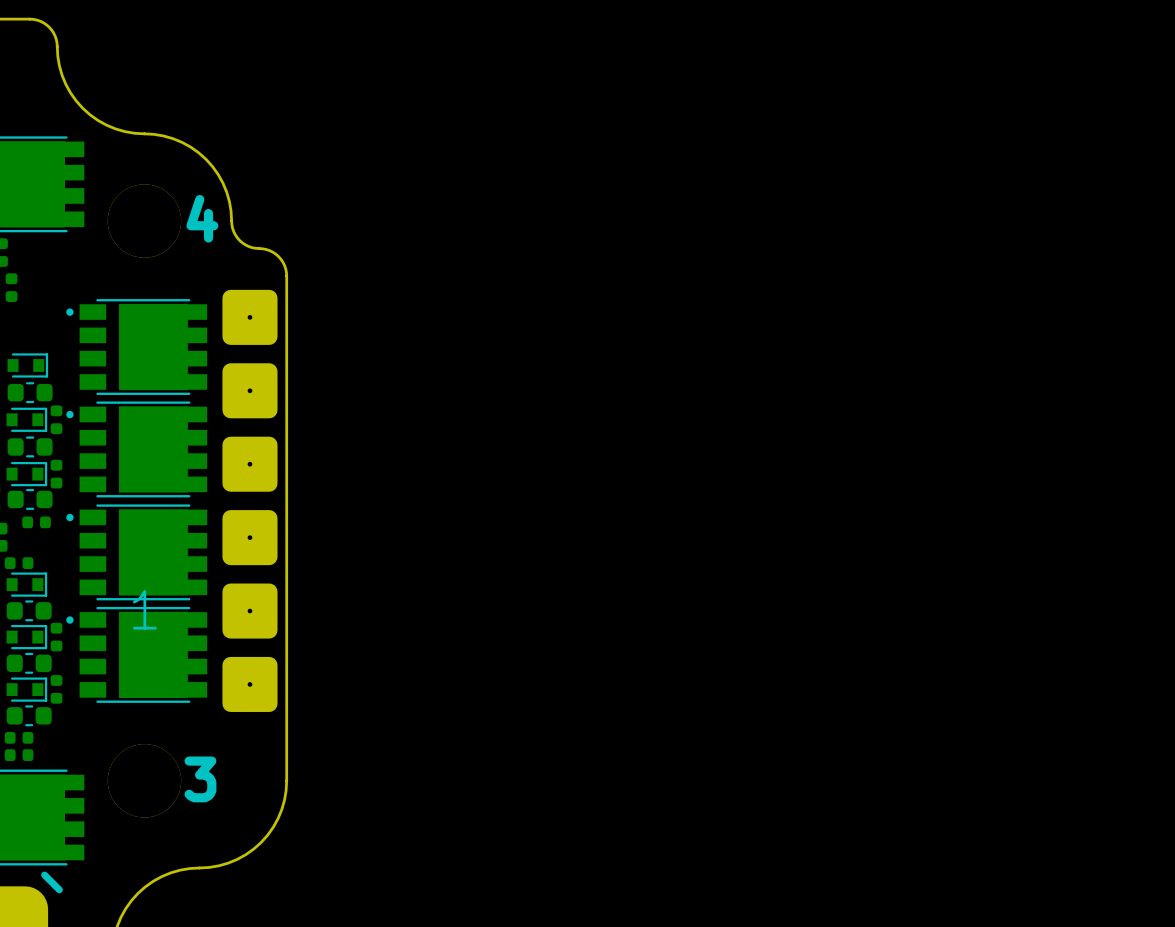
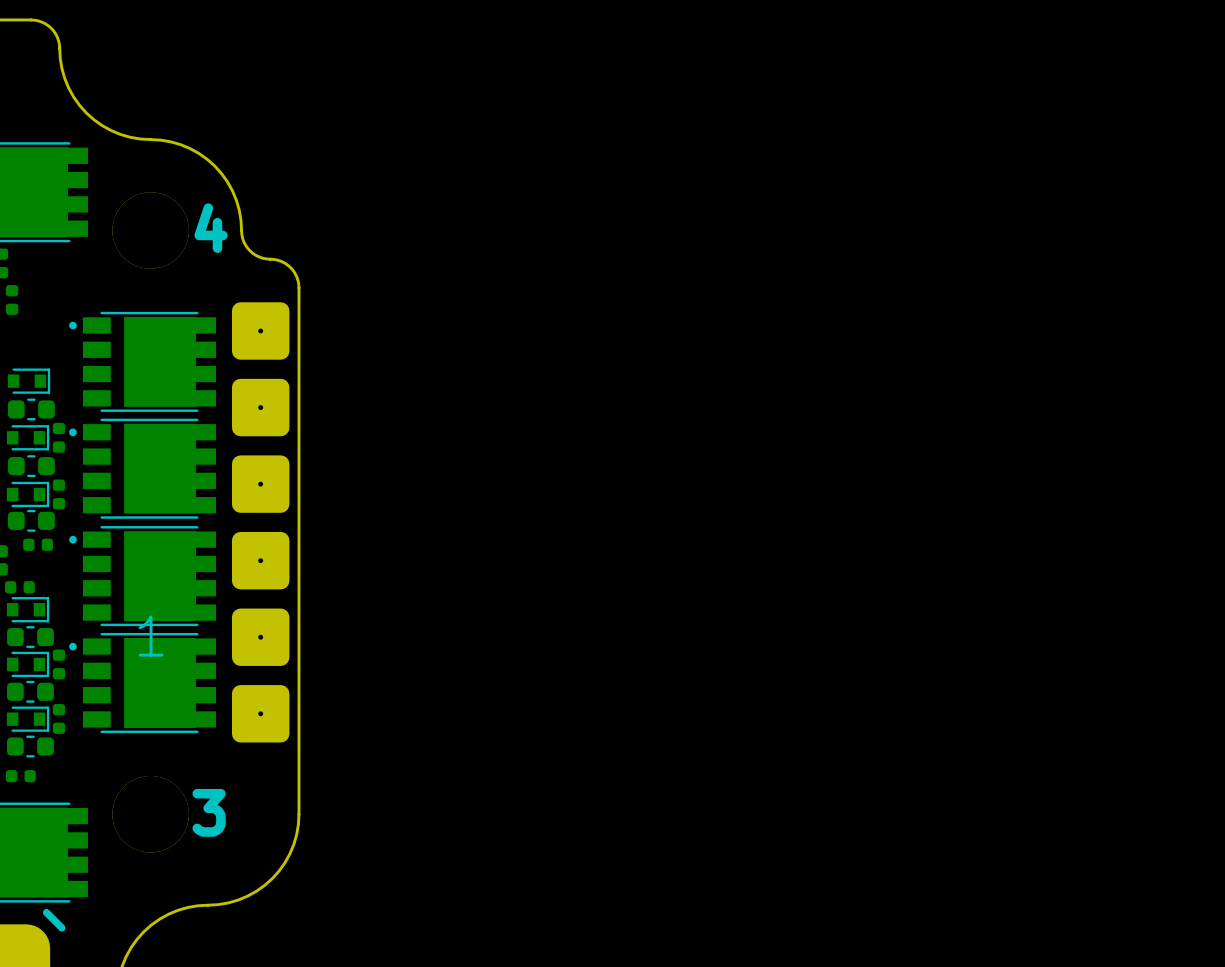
part: (19, 737) -> none
part: none -> (20, 776)
part: (19, 755) -> none

